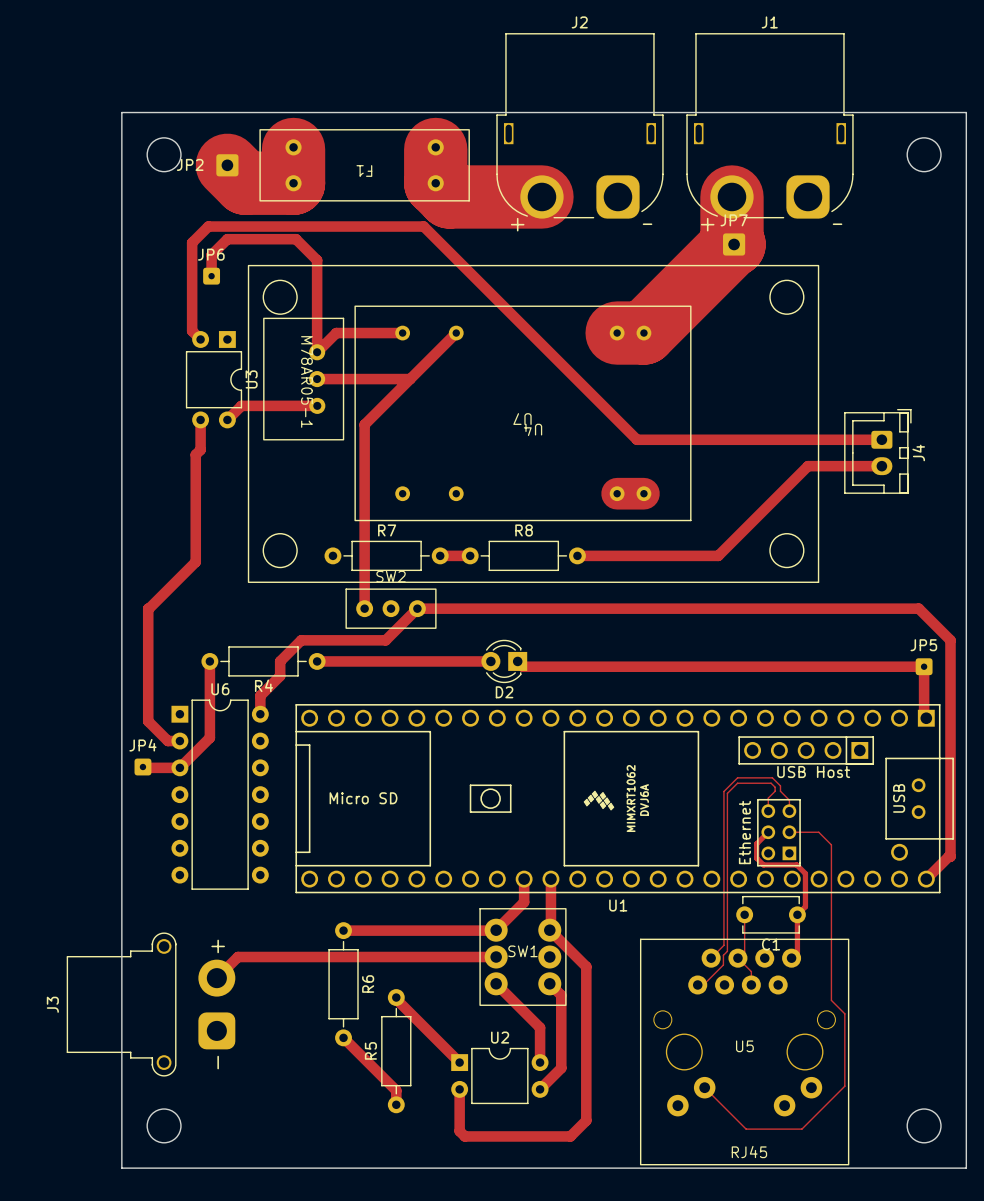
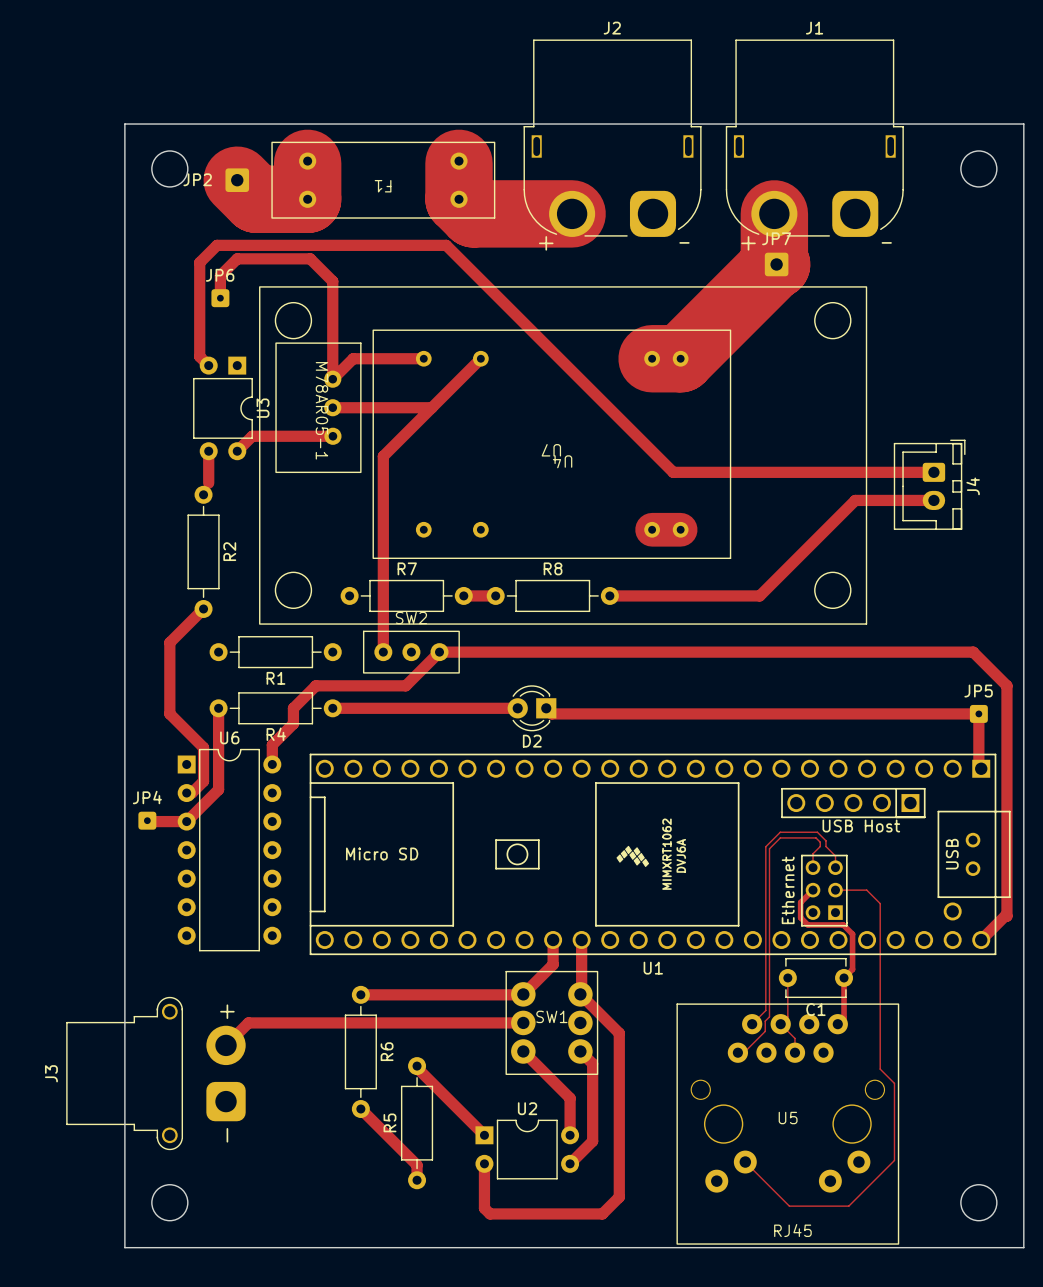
track: (200, 449) (195, 454) (195, 562) (148, 608) (148, 721) (167, 741) (179, 741) -> (203, 608) (169, 642) (169, 713) (203, 747) (203, 781) (191, 793) (186, 793)
R2: none -> (203, 551)
R1: none -> (275, 652)

